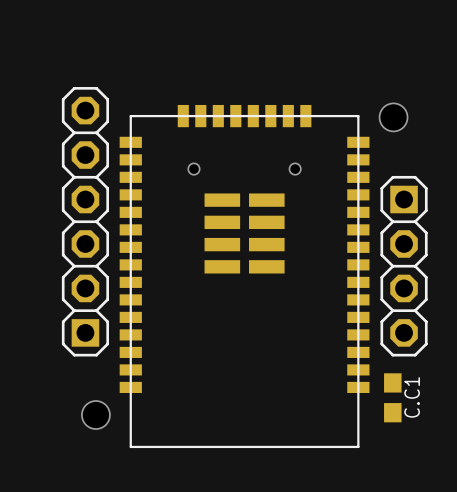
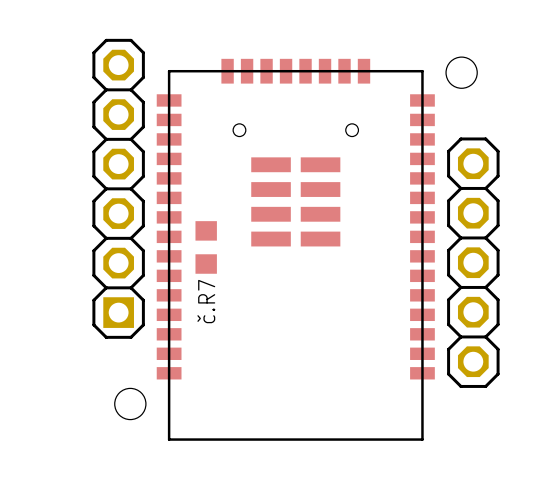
part: (404, 266) -> none
č.R7: none -> (206, 247)
part: none -> (473, 262)
C.C1: (392, 397) -> none

